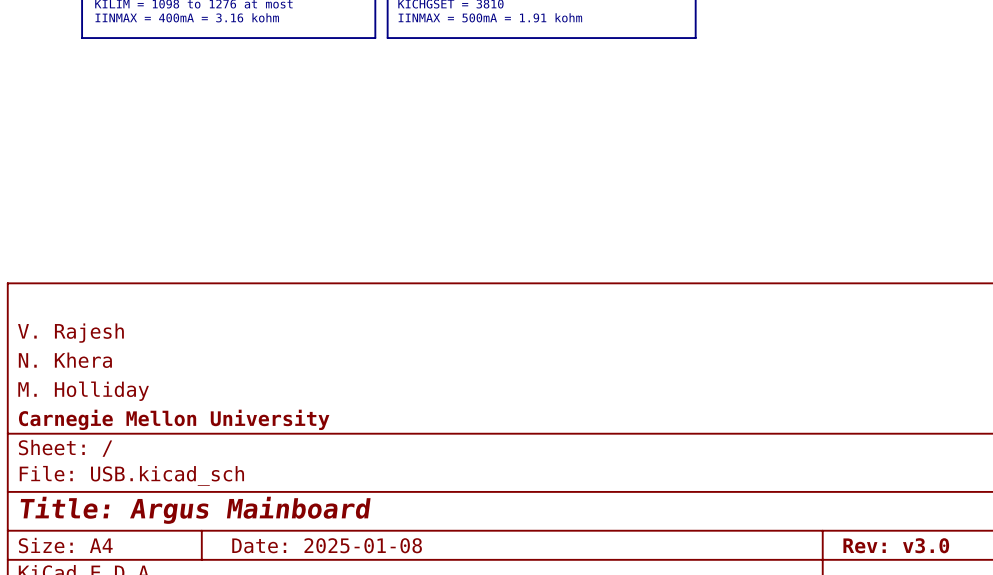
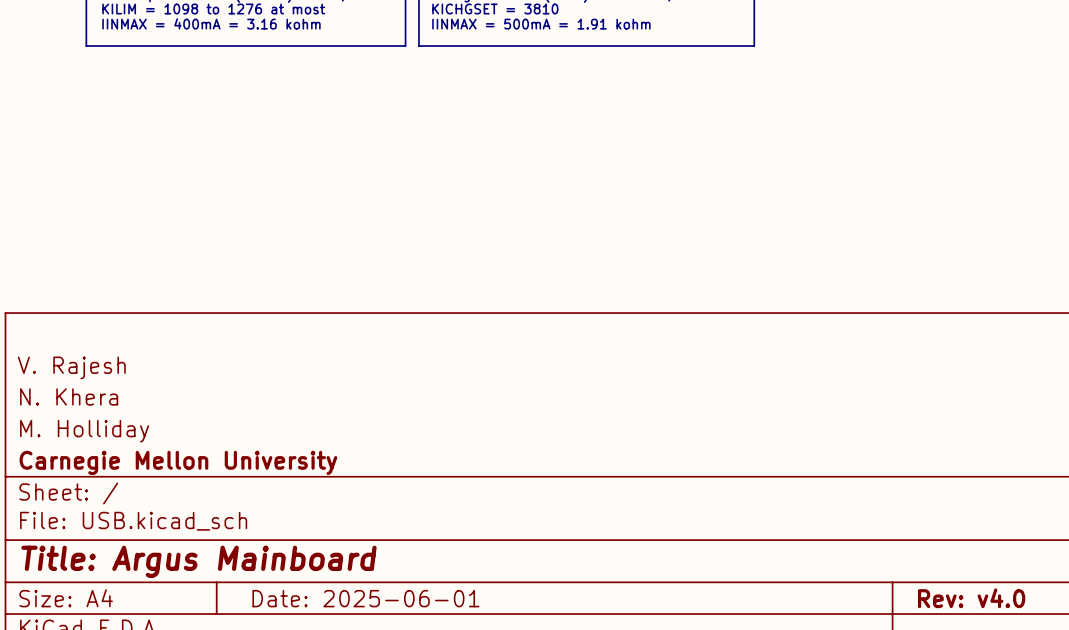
title block: Date: 2025-01-08 (327, 545) -> Date: 2025-06-01 (365, 598)
title block: Rev: v3.0 (896, 545) -> Rev: v4.0 (971, 598)

